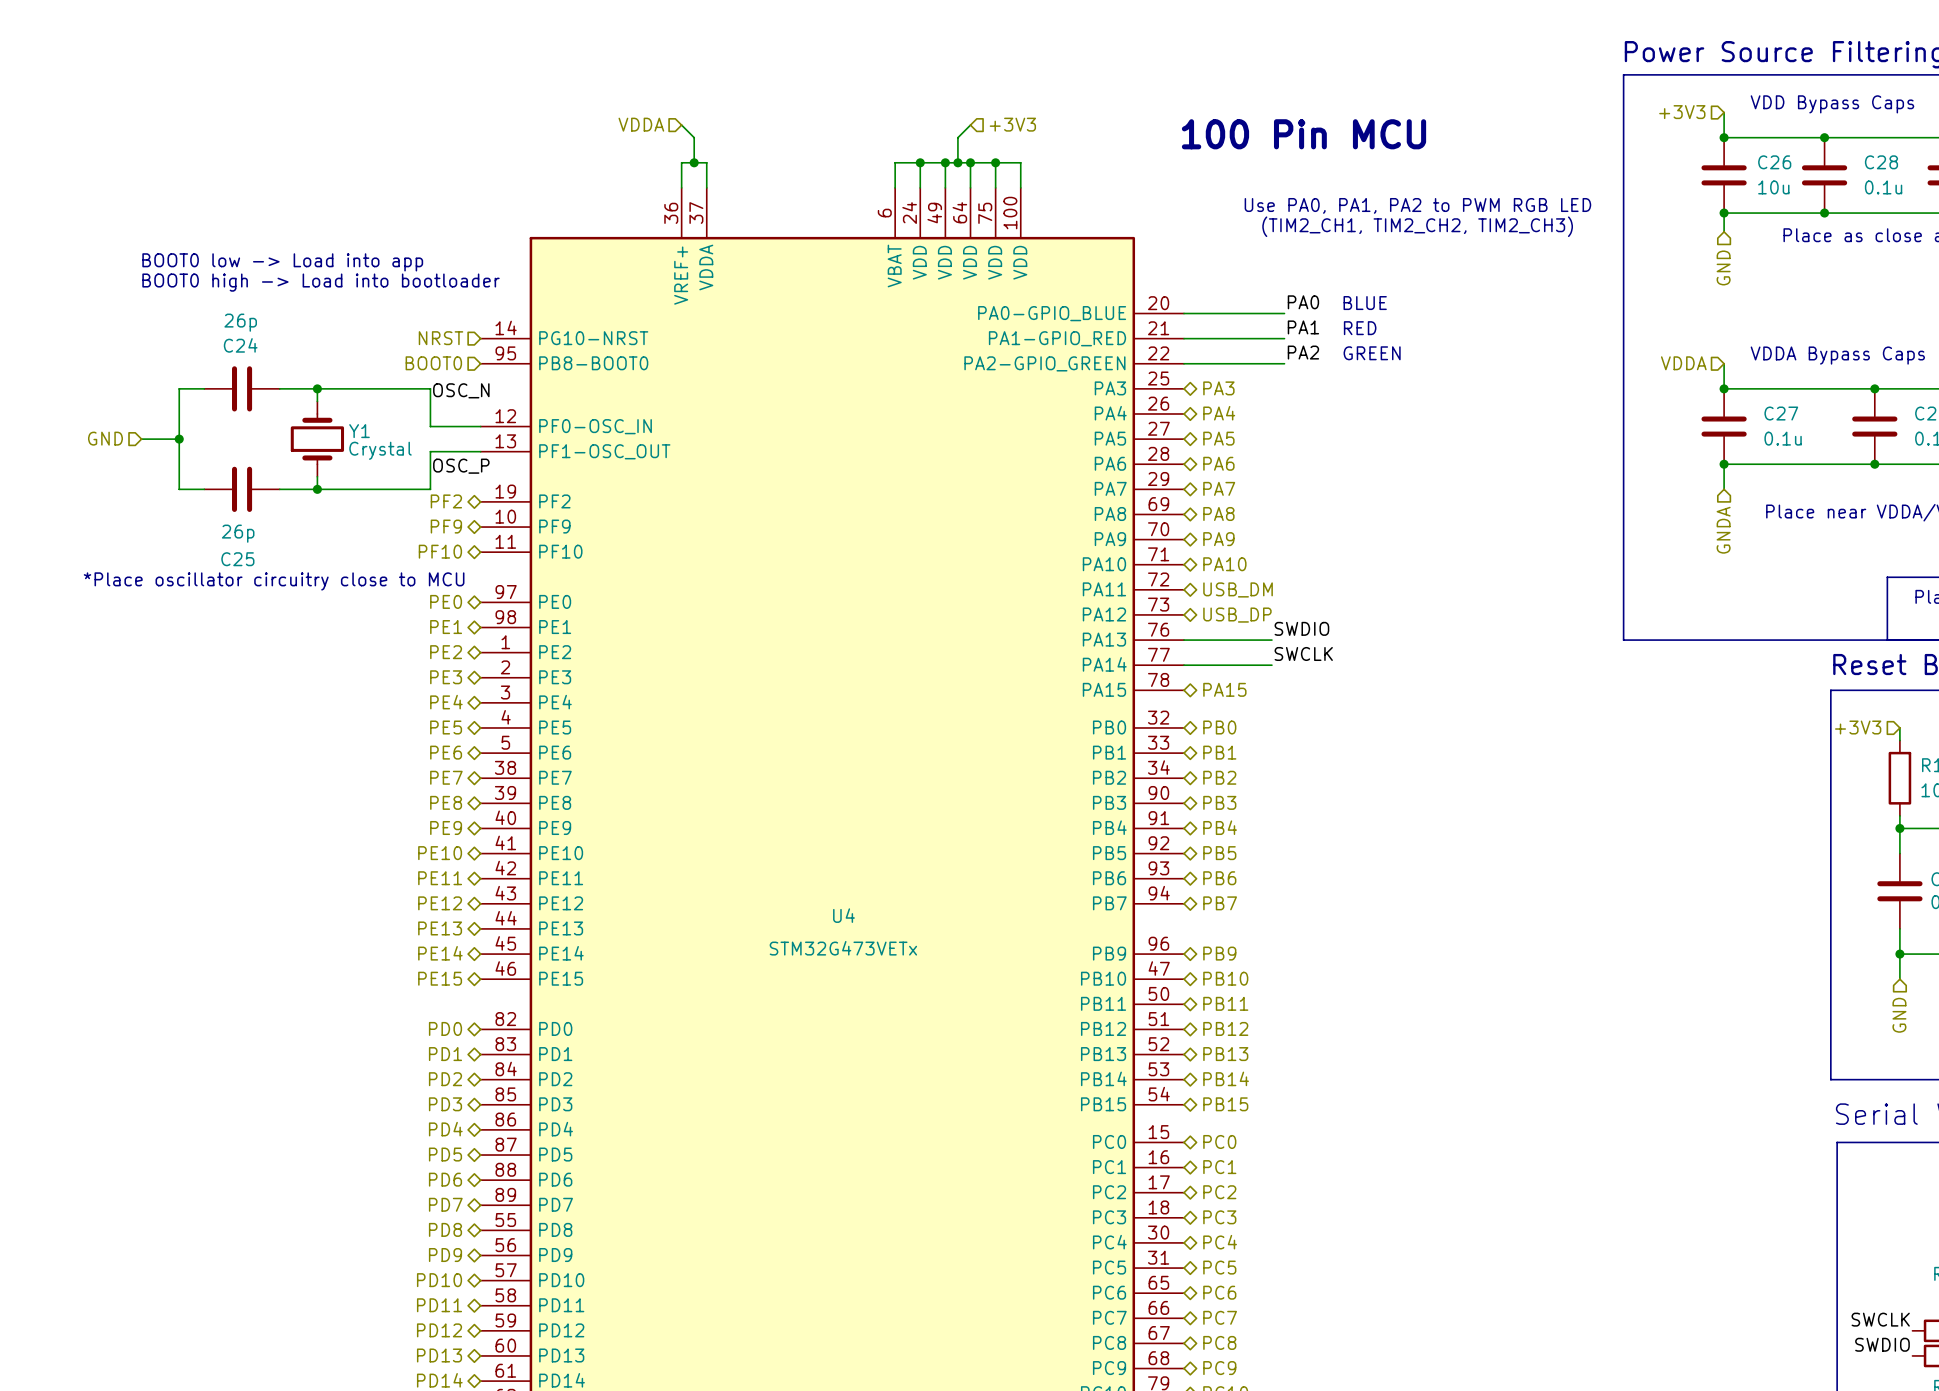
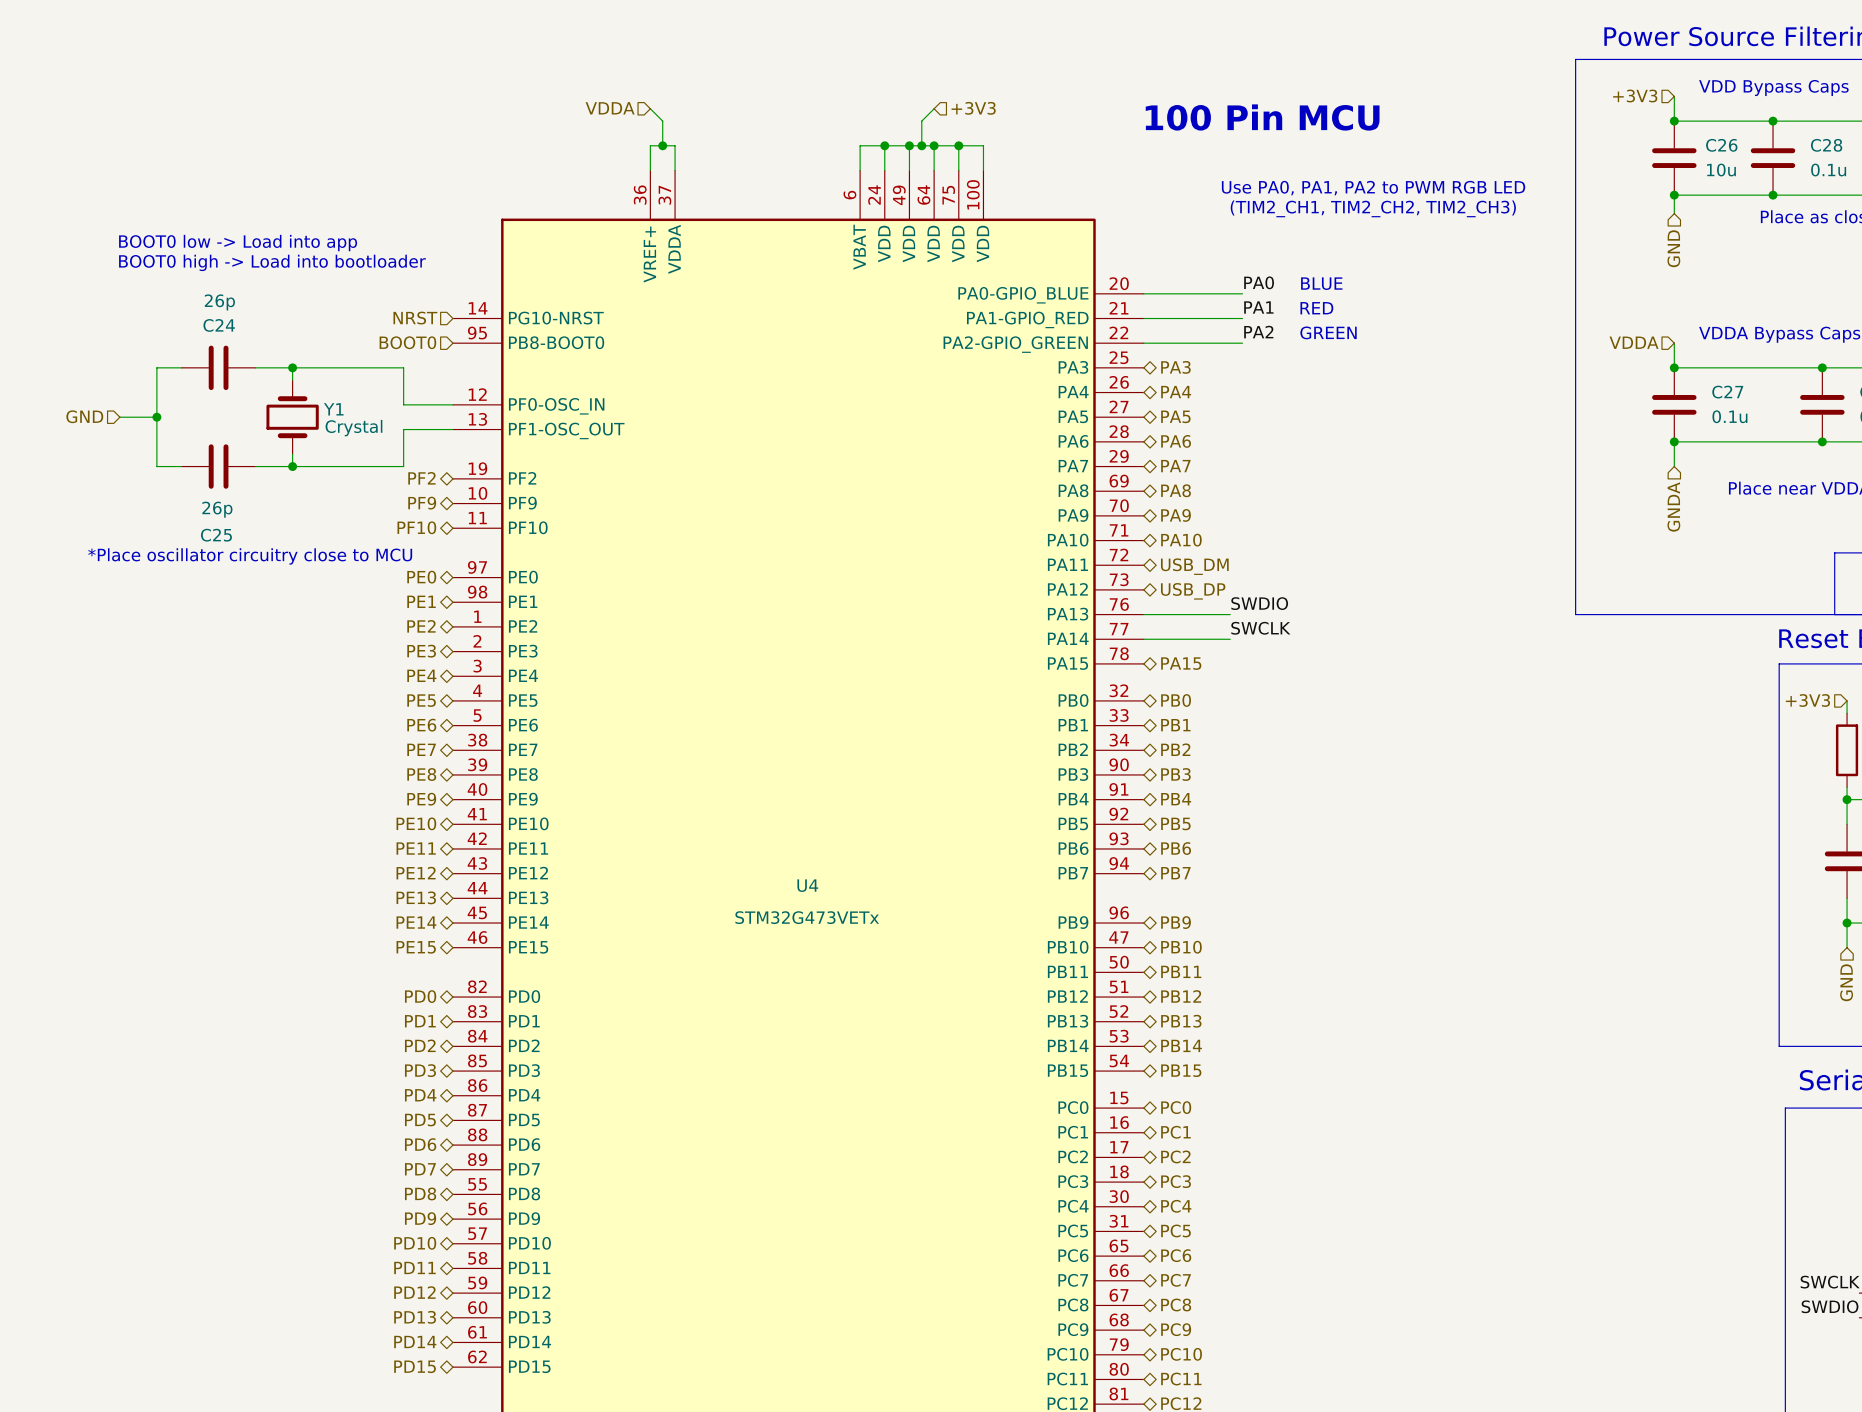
label: OSC_N (461, 390) -> none
label: OSC_P (461, 466) -> none

